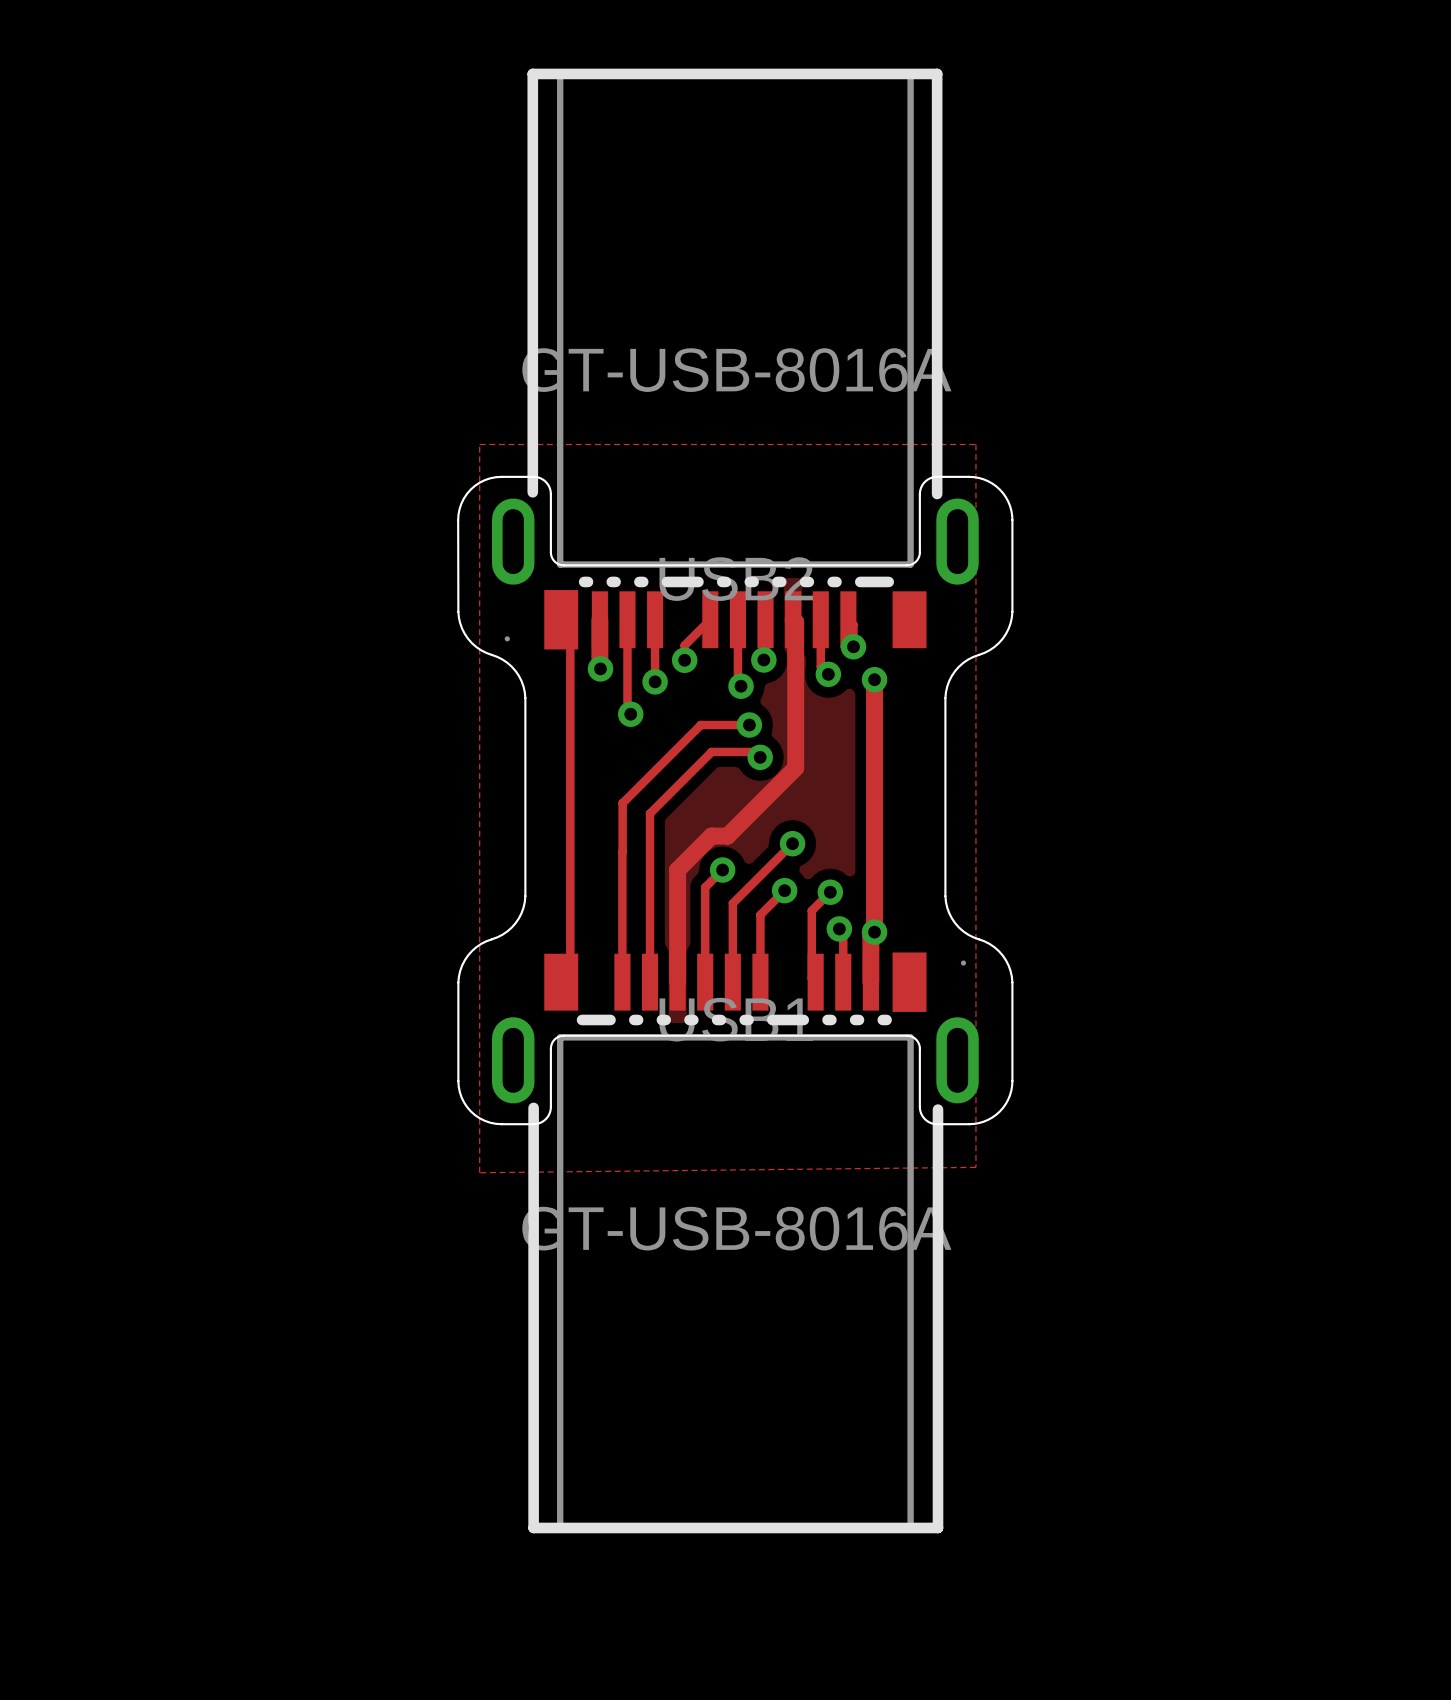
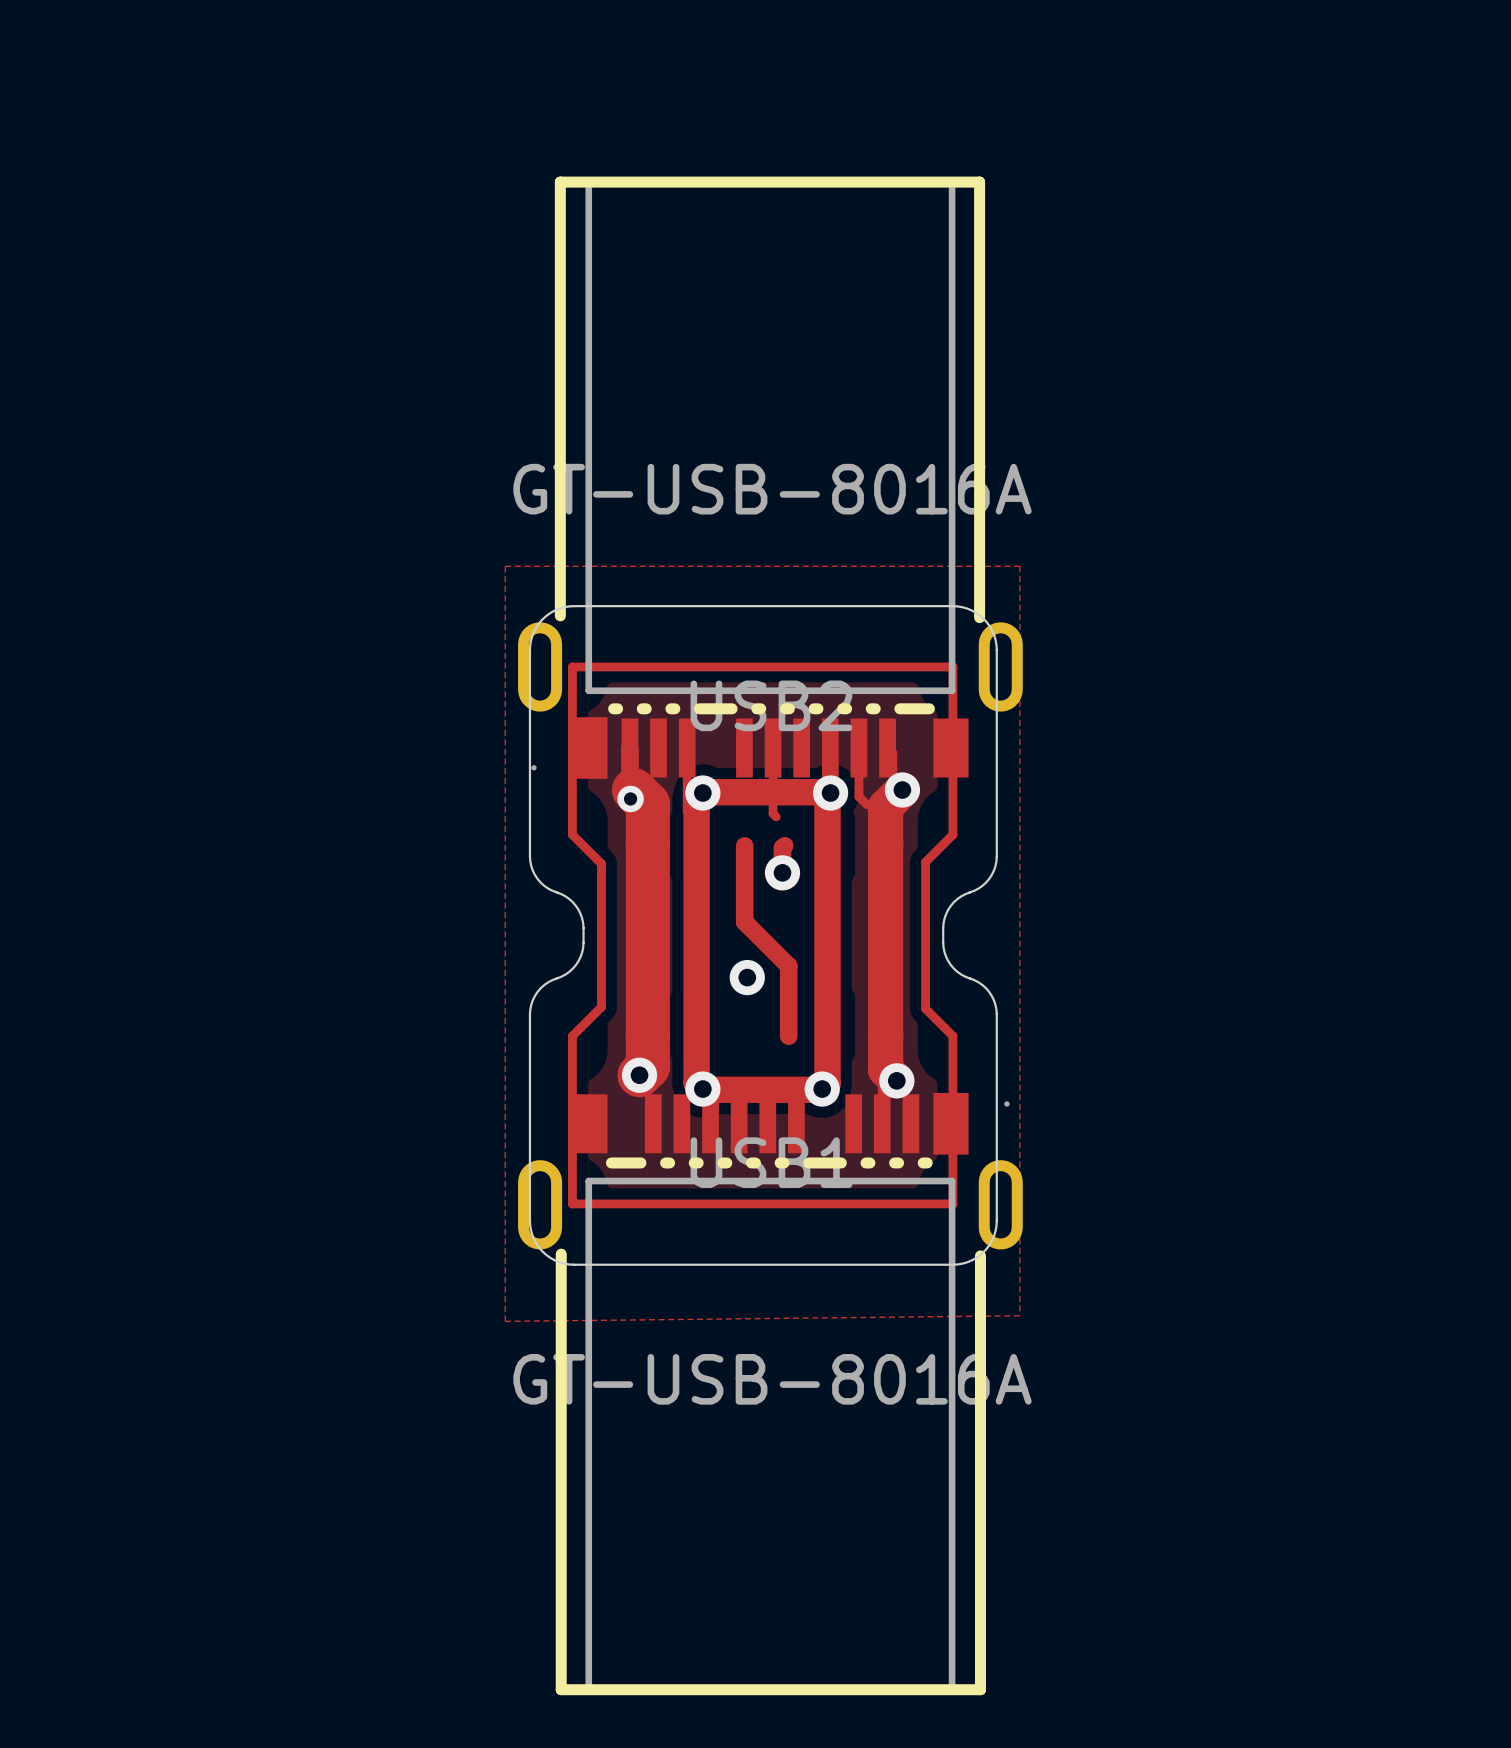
board edge: (501, 476) (537, 477) (548, 484) (550, 494) (551, 554) (554, 561) (563, 565) (908, 565) (916, 561) (919, 555) (919, 492) (926, 480) (935, 476) (974, 477) (987, 481) (1002, 493) (1009, 505) (1012, 515) (1012, 611) (1010, 623) (1002, 638) (994, 647) (968, 659) (955, 671) (947, 686) (945, 698) (945, 896) (947, 907) (955, 923) (963, 931) (989, 943) (998, 951) (1008, 965) (1011, 976) (1012, 1085) (1008, 1099) (996, 1114) (983, 1121) (974, 1123) (935, 1124) (926, 1120) (919, 1108) (919, 1045) (914, 1038) (906, 1035) (562, 1035) (554, 1039) (551, 1045) (550, 1108) (544, 1120) (535, 1124) (495, 1123) (479, 1118) (467, 1107) (461, 1097) (458, 1081) (458, 982) (460, 970) (468, 955) (476, 947) (502, 934) (515, 923) (523, 907) (525, 896) (525, 698) (523, 686) (518, 675) (507, 662) (481, 650) (468, 638) (460, 623) (458, 611) (459, 508) (467, 493) (475, 485) (490, 478) (501, 476) -> (574, 606) (554, 610) (542, 619) (534, 631) (530, 645) (530, 861) (532, 870) (540, 882) (548, 888) (565, 896) (575, 905) (580, 914) (583, 928) (583, 947) (578, 961) (569, 971) (540, 988) (532, 1000) (530, 1009) (529, 1220) (531, 1230) (536, 1244) (550, 1257) (564, 1263) (574, 1264) (952, 1264) (967, 1262) (976, 1257) (990, 1244) (996, 1225) (996, 1009) (991, 995) (986, 988) (957, 971) (948, 961) (943, 947) (943, 928) (946, 914) (950, 905) (961, 896) (978, 888) (986, 882) (993, 870) (996, 861) (996, 650) (994, 635) (990, 626) (980, 615) (971, 610) (952, 606) (574, 606)
track: none -> (572, 666) (572, 834) (601, 863) (601, 1007) (572, 1036) (572, 1203) (952, 1203) (952, 1036) (925, 1008) (925, 862) (952, 834) (952, 666) (572, 666)
track: (561, 619) (570, 628) (570, 973) (561, 982) -> none
track: (627, 619) (627, 710) (630, 714) -> none
track: (710, 619) (684, 645) (684, 660) -> none
track: (793, 619) (795, 622) (795, 767) (727, 836) (711, 836) (677, 869) (677, 982) -> none
via: (853, 646) -> none
via position: (763, 659) -> (830, 793)
track: none -> (633, 790) (647, 803) (647, 1066) (639, 1075)
via: (684, 660) -> none
track: none -> (902, 790) (885, 806) (885, 1069) (896, 1080)
via: none -> (902, 790)
track: none -> (703, 792) (696, 799) (696, 1082) (703, 1089) (821, 1089) (827, 1083) (827, 796) (830, 793) (703, 792)
via: none -> (702, 793)
via: (828, 674) -> none
track: (874, 679) (874, 932) (870, 935) (870, 982) -> none
via: (874, 679) -> none
via: (655, 681) -> none
via: (741, 686) -> none
via: (630, 714) -> none
track: none -> (744, 845) (744, 922) (788, 966) (788, 1036)
track: none -> (784, 845) (782, 847) (782, 872)
track: (749, 725) (700, 725) (622, 803) (622, 851) -> none
via: (749, 725) -> none
via: none -> (782, 872)
track: (760, 757) (754, 751) (711, 751) (650, 813) (650, 982) -> none
via: (760, 757) -> none
track: (792, 843) (732, 903) (732, 982) -> none
via: (792, 843) -> none
track: (622, 852) (622, 982) -> none
track: (722, 870) (705, 887) (705, 982) -> none
via position: (722, 870) -> (747, 977)
track: (784, 890) (760, 914) (760, 982) -> none
via: (784, 890) -> none
track: (830, 892) (811, 910) (811, 978) (815, 982) -> none
via: (830, 892) -> none
via: (839, 928) -> none
via: (874, 932) -> none
via: none -> (639, 1075)
via: none -> (896, 1080)
via: none -> (702, 1089)
via: none -> (822, 1089)

